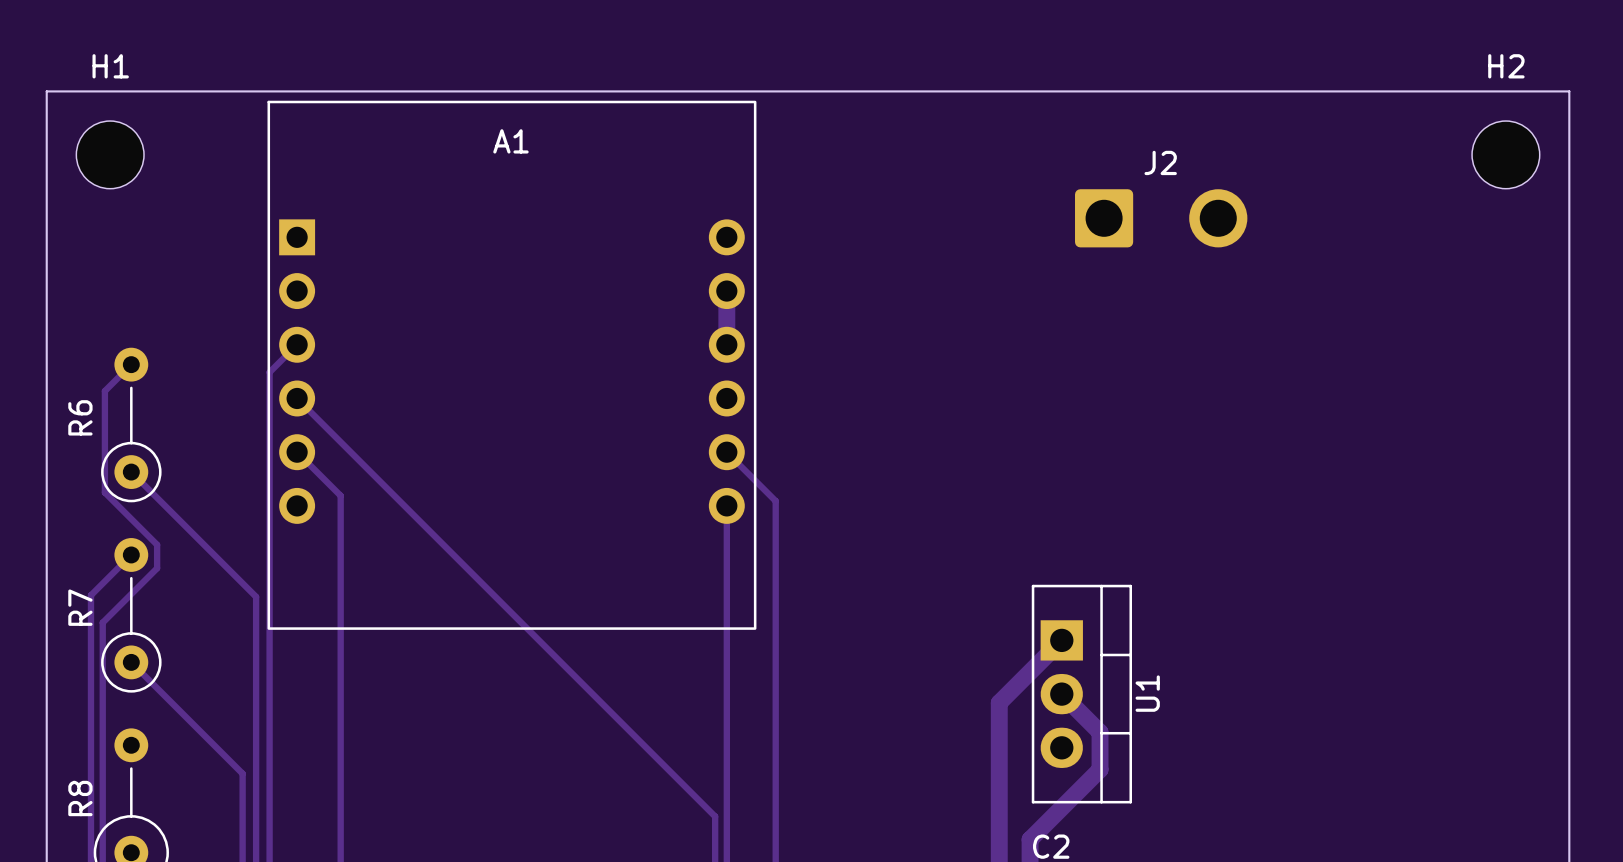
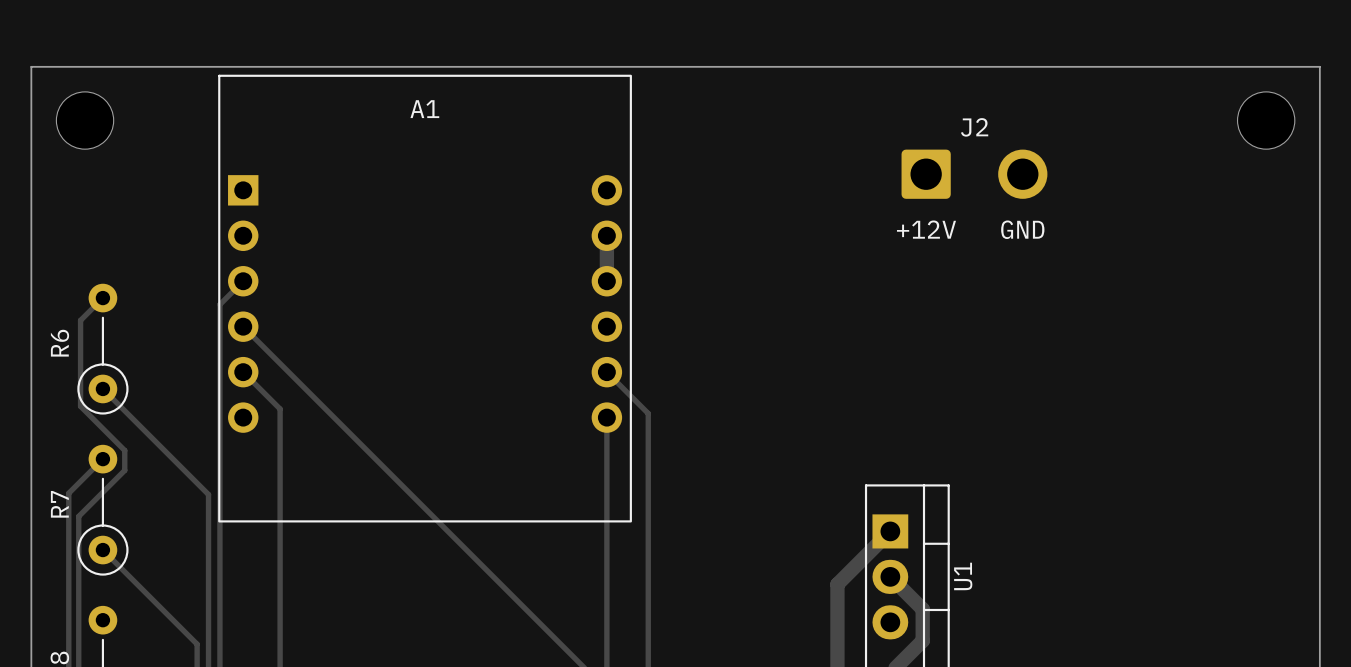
H1 name: H1 (110, 66) -> none
H2 name: H2 (1506, 66) -> none
text: none -> +12V (926, 229)
text: none -> GND (1022, 229)

